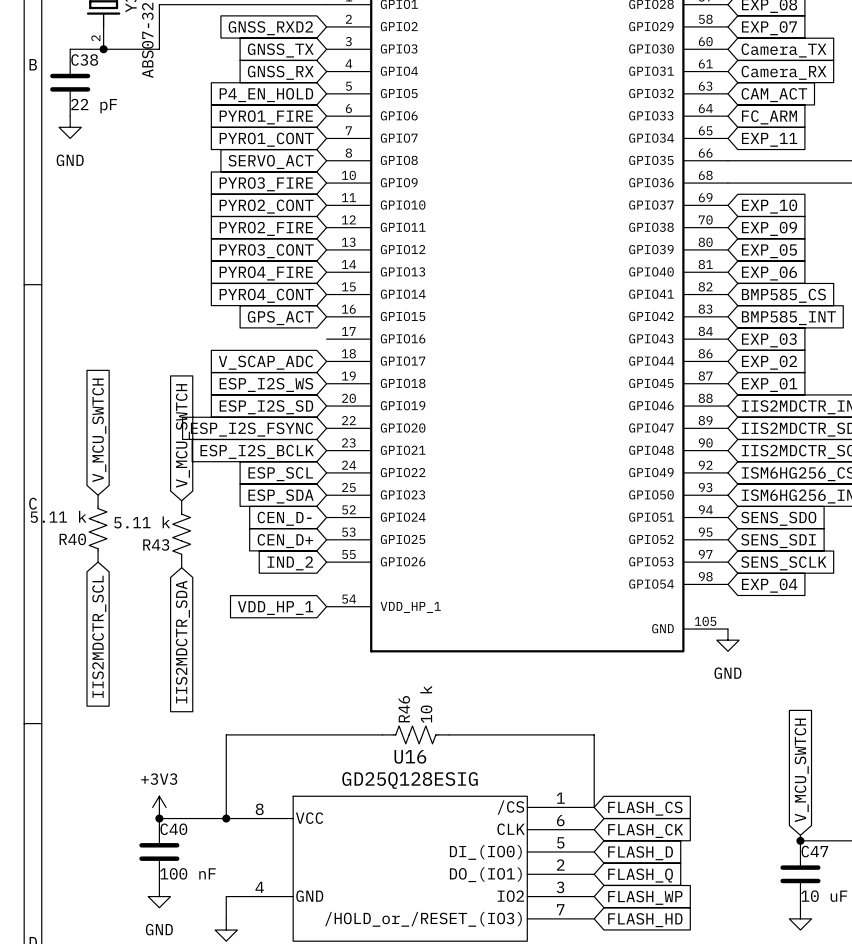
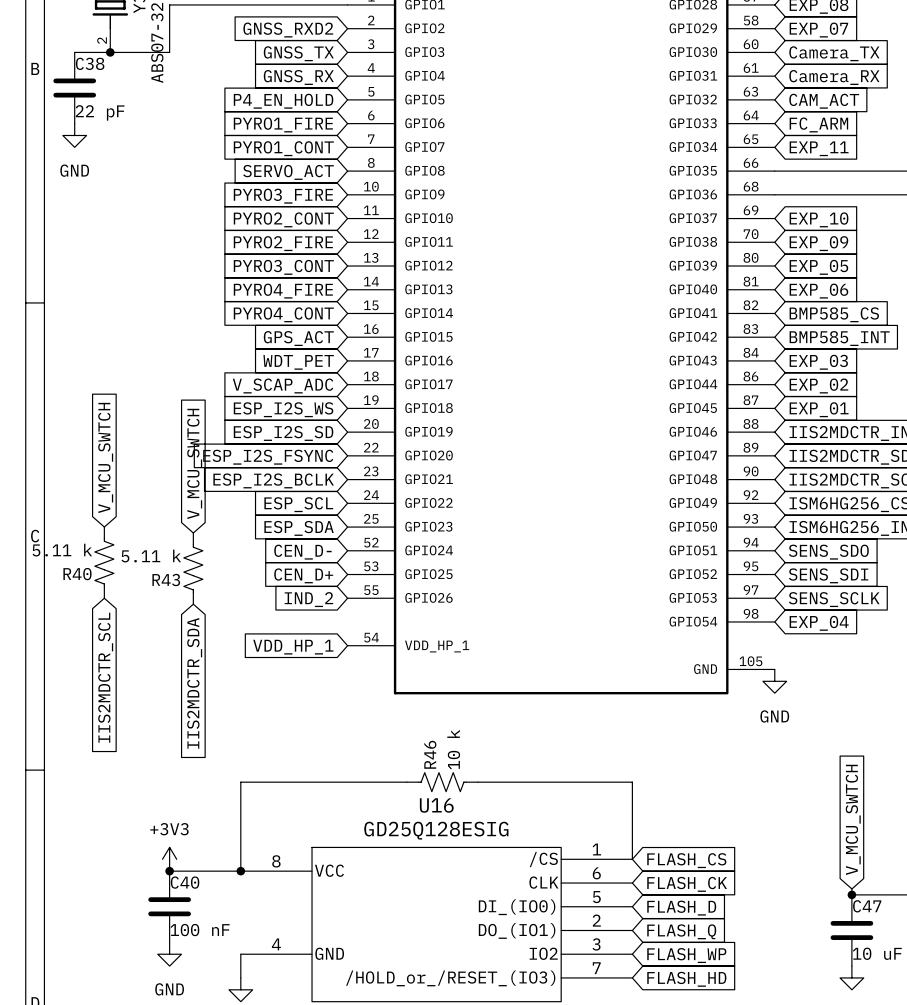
global label: none -> WDT_PET (298, 362)

